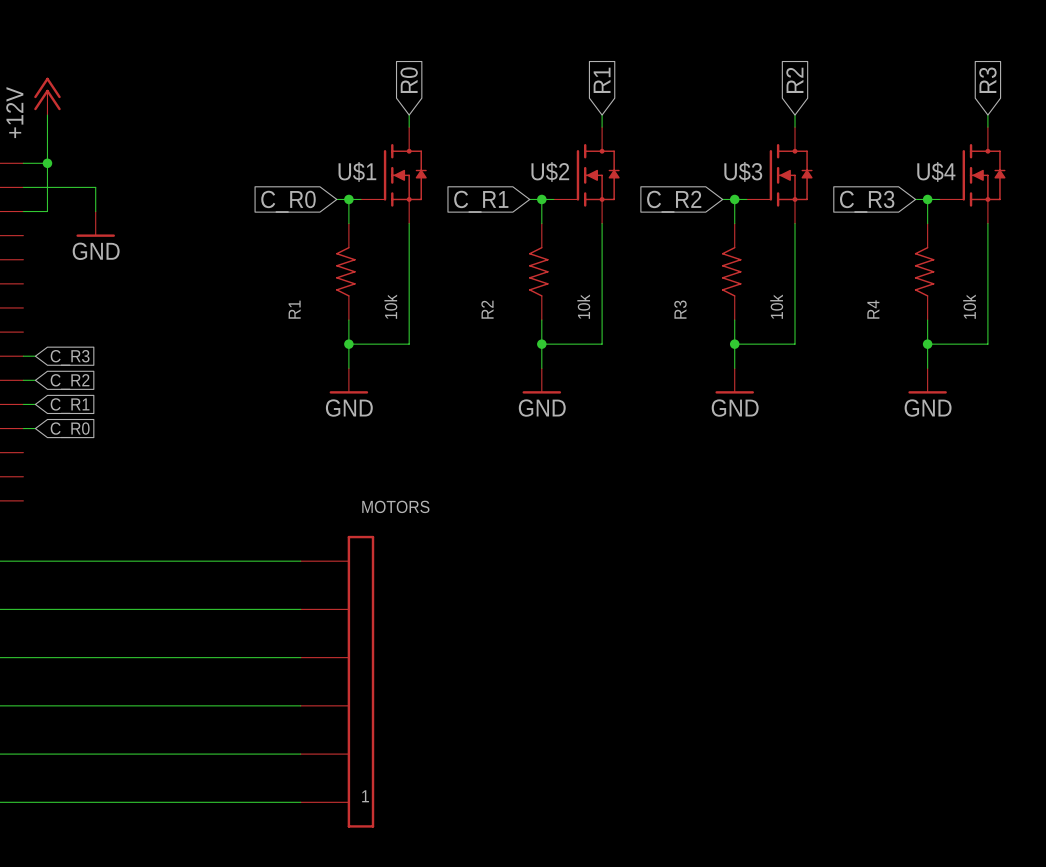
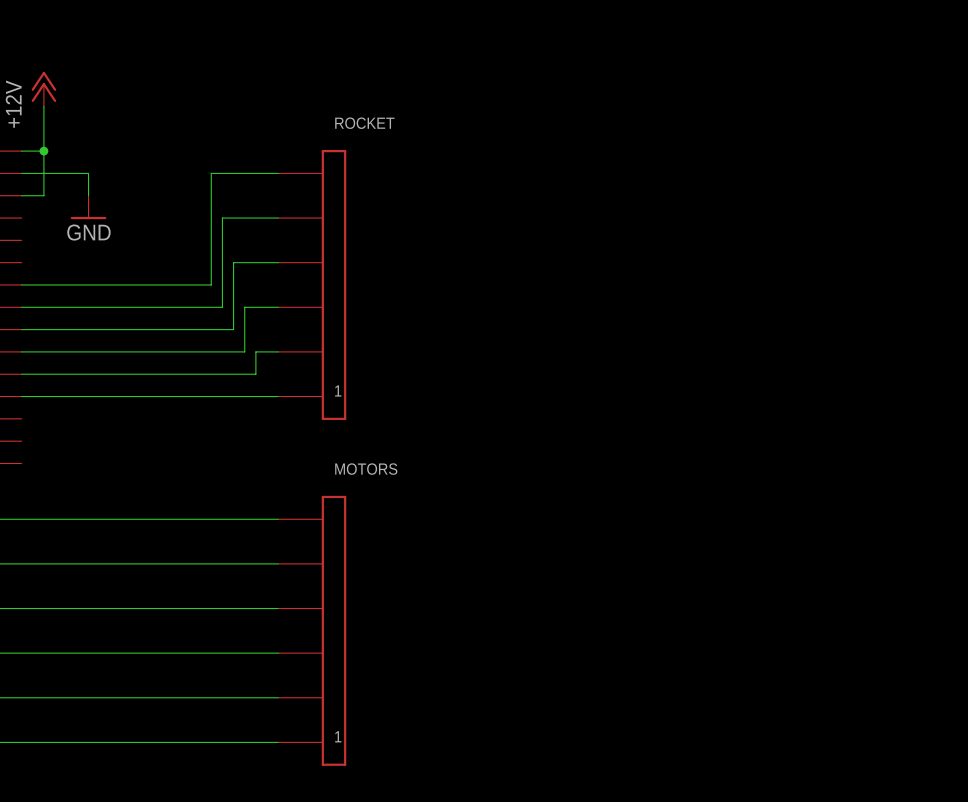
global label: R0 (409, 80) -> none
global label: R1 (602, 80) -> none
global label: R2 (794, 80) -> none
global label: R3 (987, 80) -> none
wire: (409, 115) (409, 127) -> none
wire: (602, 115) (602, 127) -> none
wire: (795, 115) (795, 127) -> none
wire: (987, 115) (987, 127) -> none
U$1: (393, 175) -> none
U$2: (586, 175) -> none
U$3: (779, 175) -> none
U$4: (972, 175) -> none
wire: none -> (278, 173) (211, 173) (211, 284) (21, 284)
wire: (336, 199) (360, 199) -> none
junction: (348, 199) -> none
wire: (529, 199) (553, 199) -> none
wire: (541, 199) (541, 223) -> none
junction: (541, 199) -> none
wire: (722, 199) (746, 199) -> none
wire: (734, 199) (734, 223) -> none
junction: (734, 199) -> none
wire: (915, 199) (939, 199) -> none
wire: (927, 199) (927, 223) -> none
junction: (927, 199) -> none
global label: C_R0 (288, 201) -> none
global label: C_R1 (481, 201) -> none
global label: C_R2 (674, 201) -> none
global label: C_R3 (867, 201) -> none
wire: (409, 223) (409, 344) (348, 344) -> none
wire: (602, 223) (602, 344) (541, 344) -> none
wire: (795, 223) (795, 344) (734, 344) -> none
wire: (987, 223) (987, 344) (927, 344) -> none
wire: none -> (278, 218) (222, 218) (222, 307) (21, 307)
R1: 10k (345, 271) -> none
R2: 10k (538, 271) -> none
R3: 10k (731, 271) -> none
R4: 10k (924, 271) -> none
wire: none -> (278, 262) (233, 262) (233, 329) (32, 329)
ROCKET: none -> (312, 284)
wire: (541, 320) (541, 368) -> none
wire: (734, 320) (734, 368) -> none
wire: (927, 320) (927, 368) -> none
wire: none -> (278, 307) (244, 307) (244, 351) (32, 351)
junction: (348, 344) -> none
junction: (541, 344) -> none
junction: (734, 344) -> none
junction: (927, 344) -> none
global label: C_R3 (70, 357) -> none
wire: none -> (278, 351) (255, 351) (255, 374) (32, 374)
power symbol: GND (348, 380) -> none
power symbol: GND (541, 380) -> none
power symbol: GND (734, 380) -> none
power symbol: GND (927, 380) -> none
global label: C_R2 (70, 381) -> none
global label: C_R1 (70, 406) -> none
wire: none -> (32, 396) (278, 396)
global label: C_R0 (70, 430) -> none

